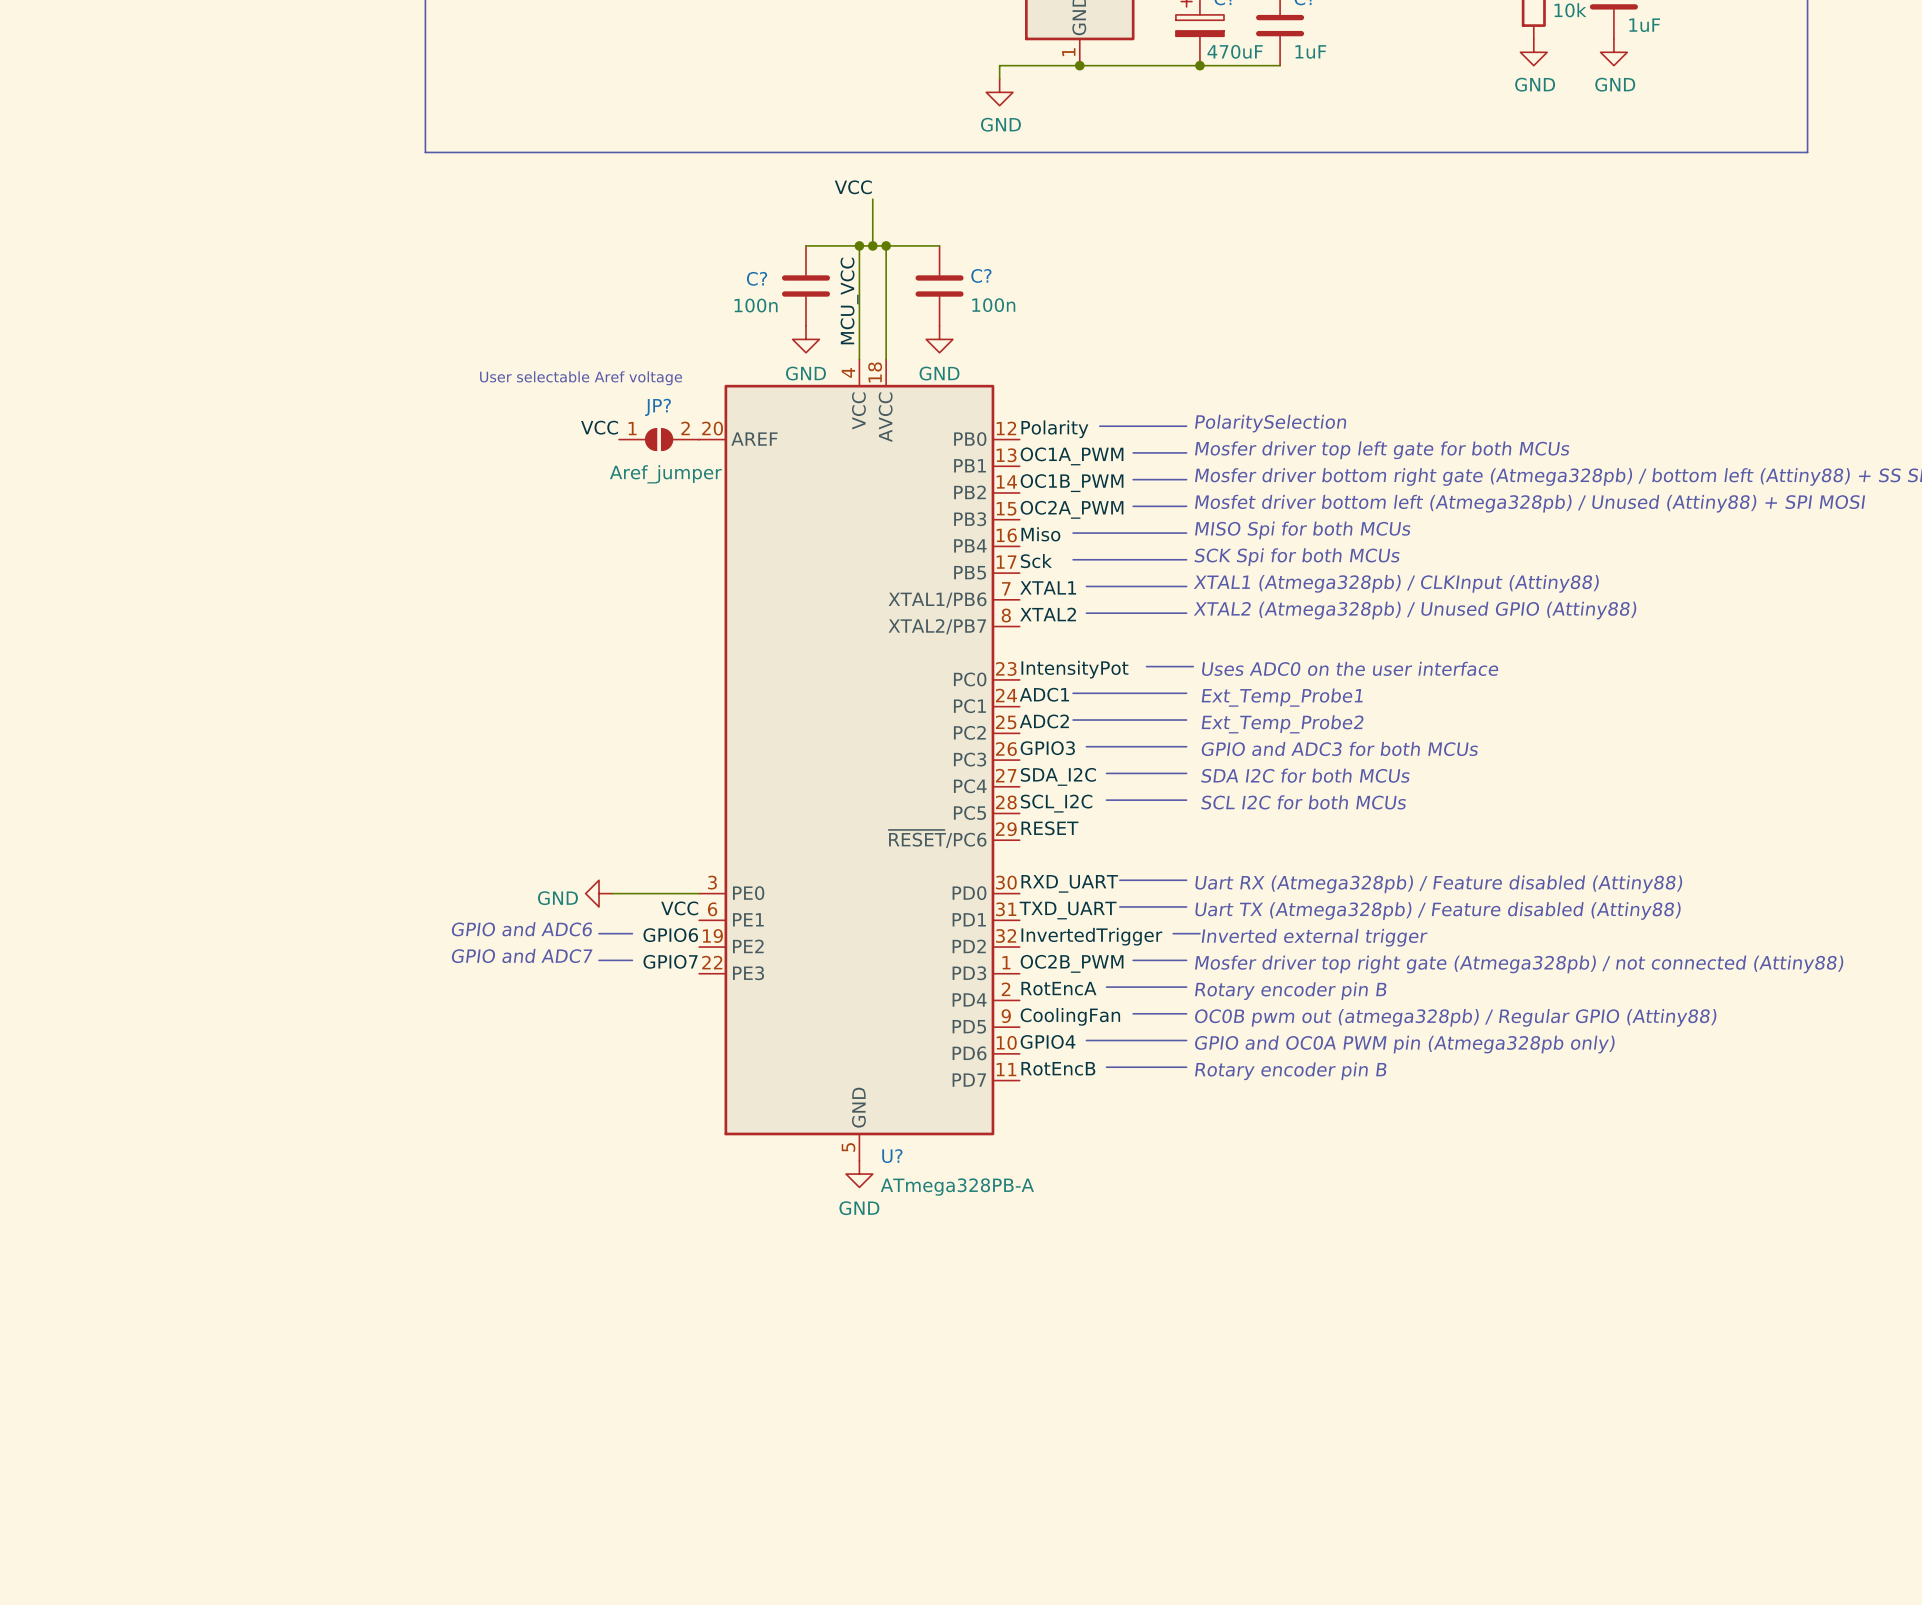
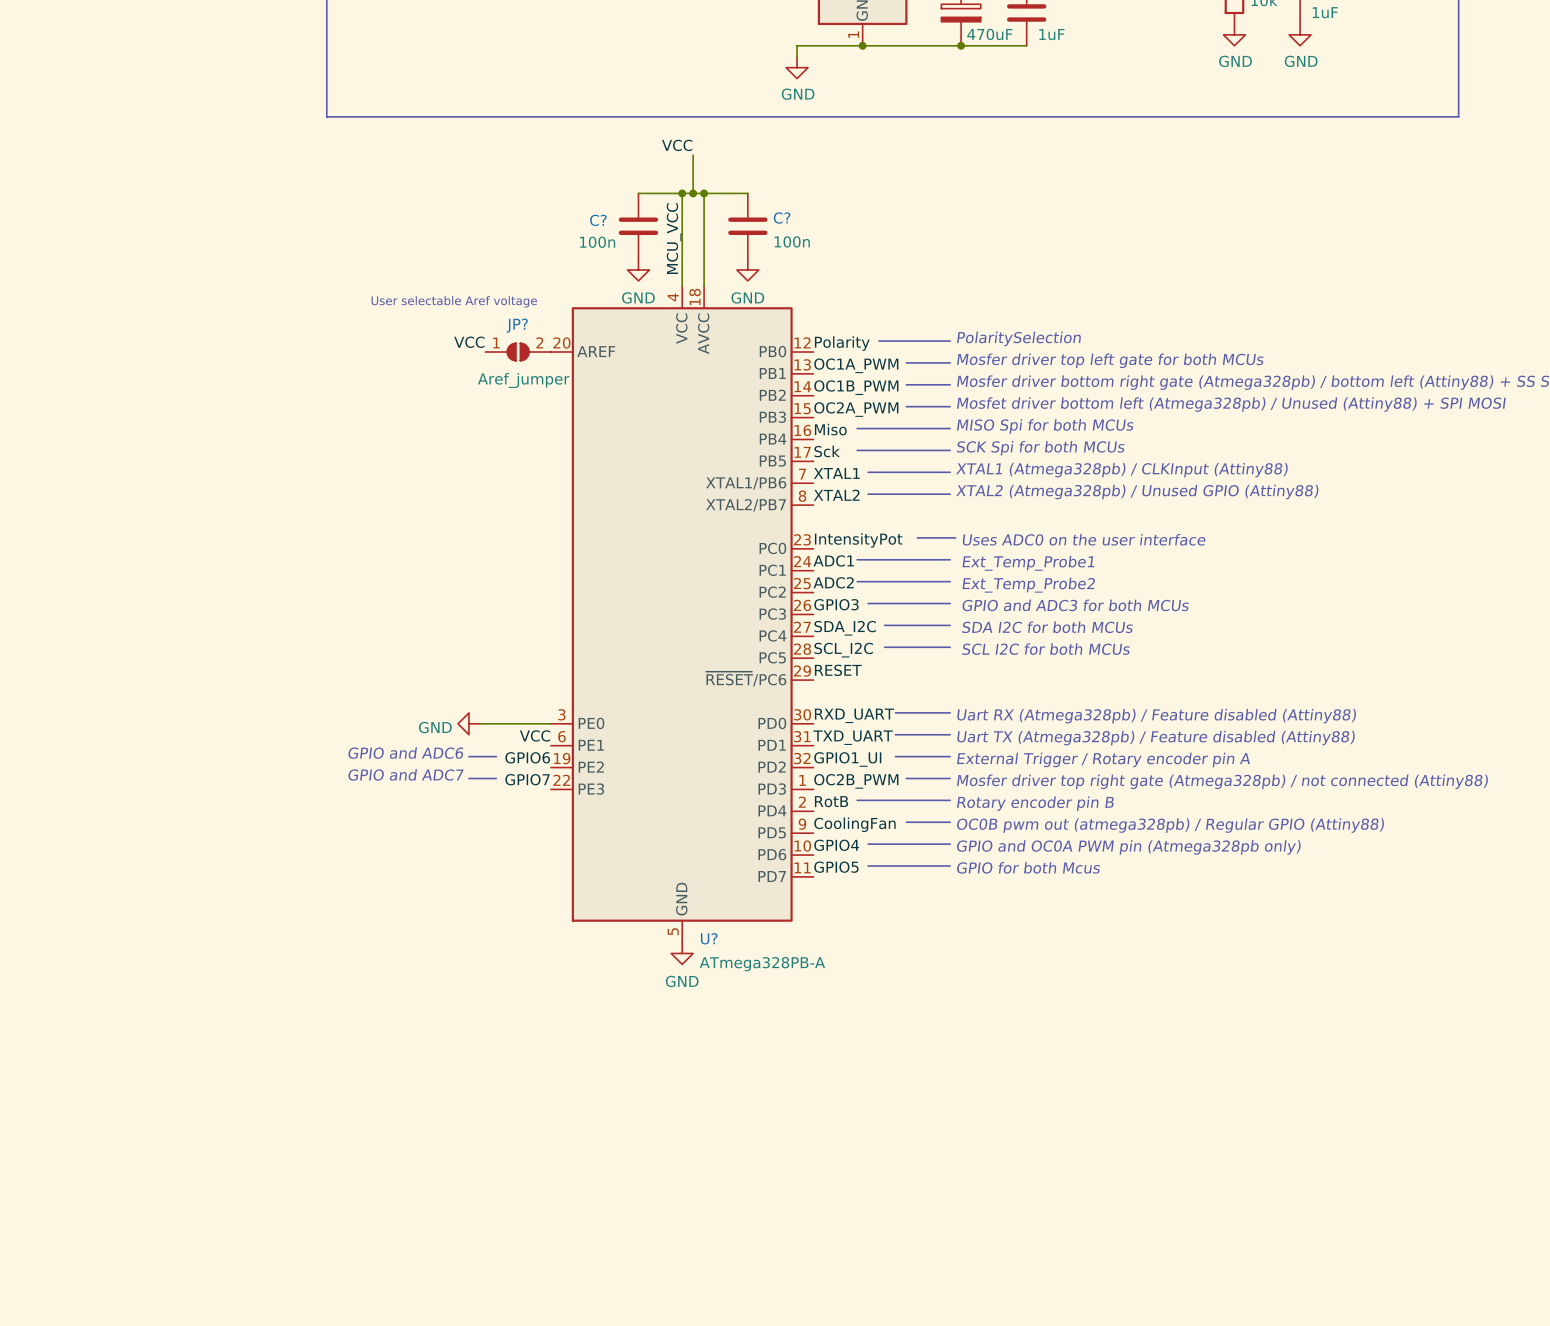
line: none -> (895, 756) (939, 756)
line: (1186, 933) (1199, 933) -> none
label: InvertedTrigger (1091, 936) -> GPIO1_UI (847, 759)
text: Inverted external trigger (1314, 937) -> External Trigger / Rotary encoder pin A (1103, 759)
line: none -> (857, 800) (884, 800)
label: RotEncA (1058, 988) -> RotB (831, 801)
line: none -> (868, 865) (884, 865)
label: RotEncB (1058, 1068) -> GPIO5 (836, 867)
text: Rotary encoder pin B (1290, 1071) -> GPIO for both Mcus (1028, 867)

